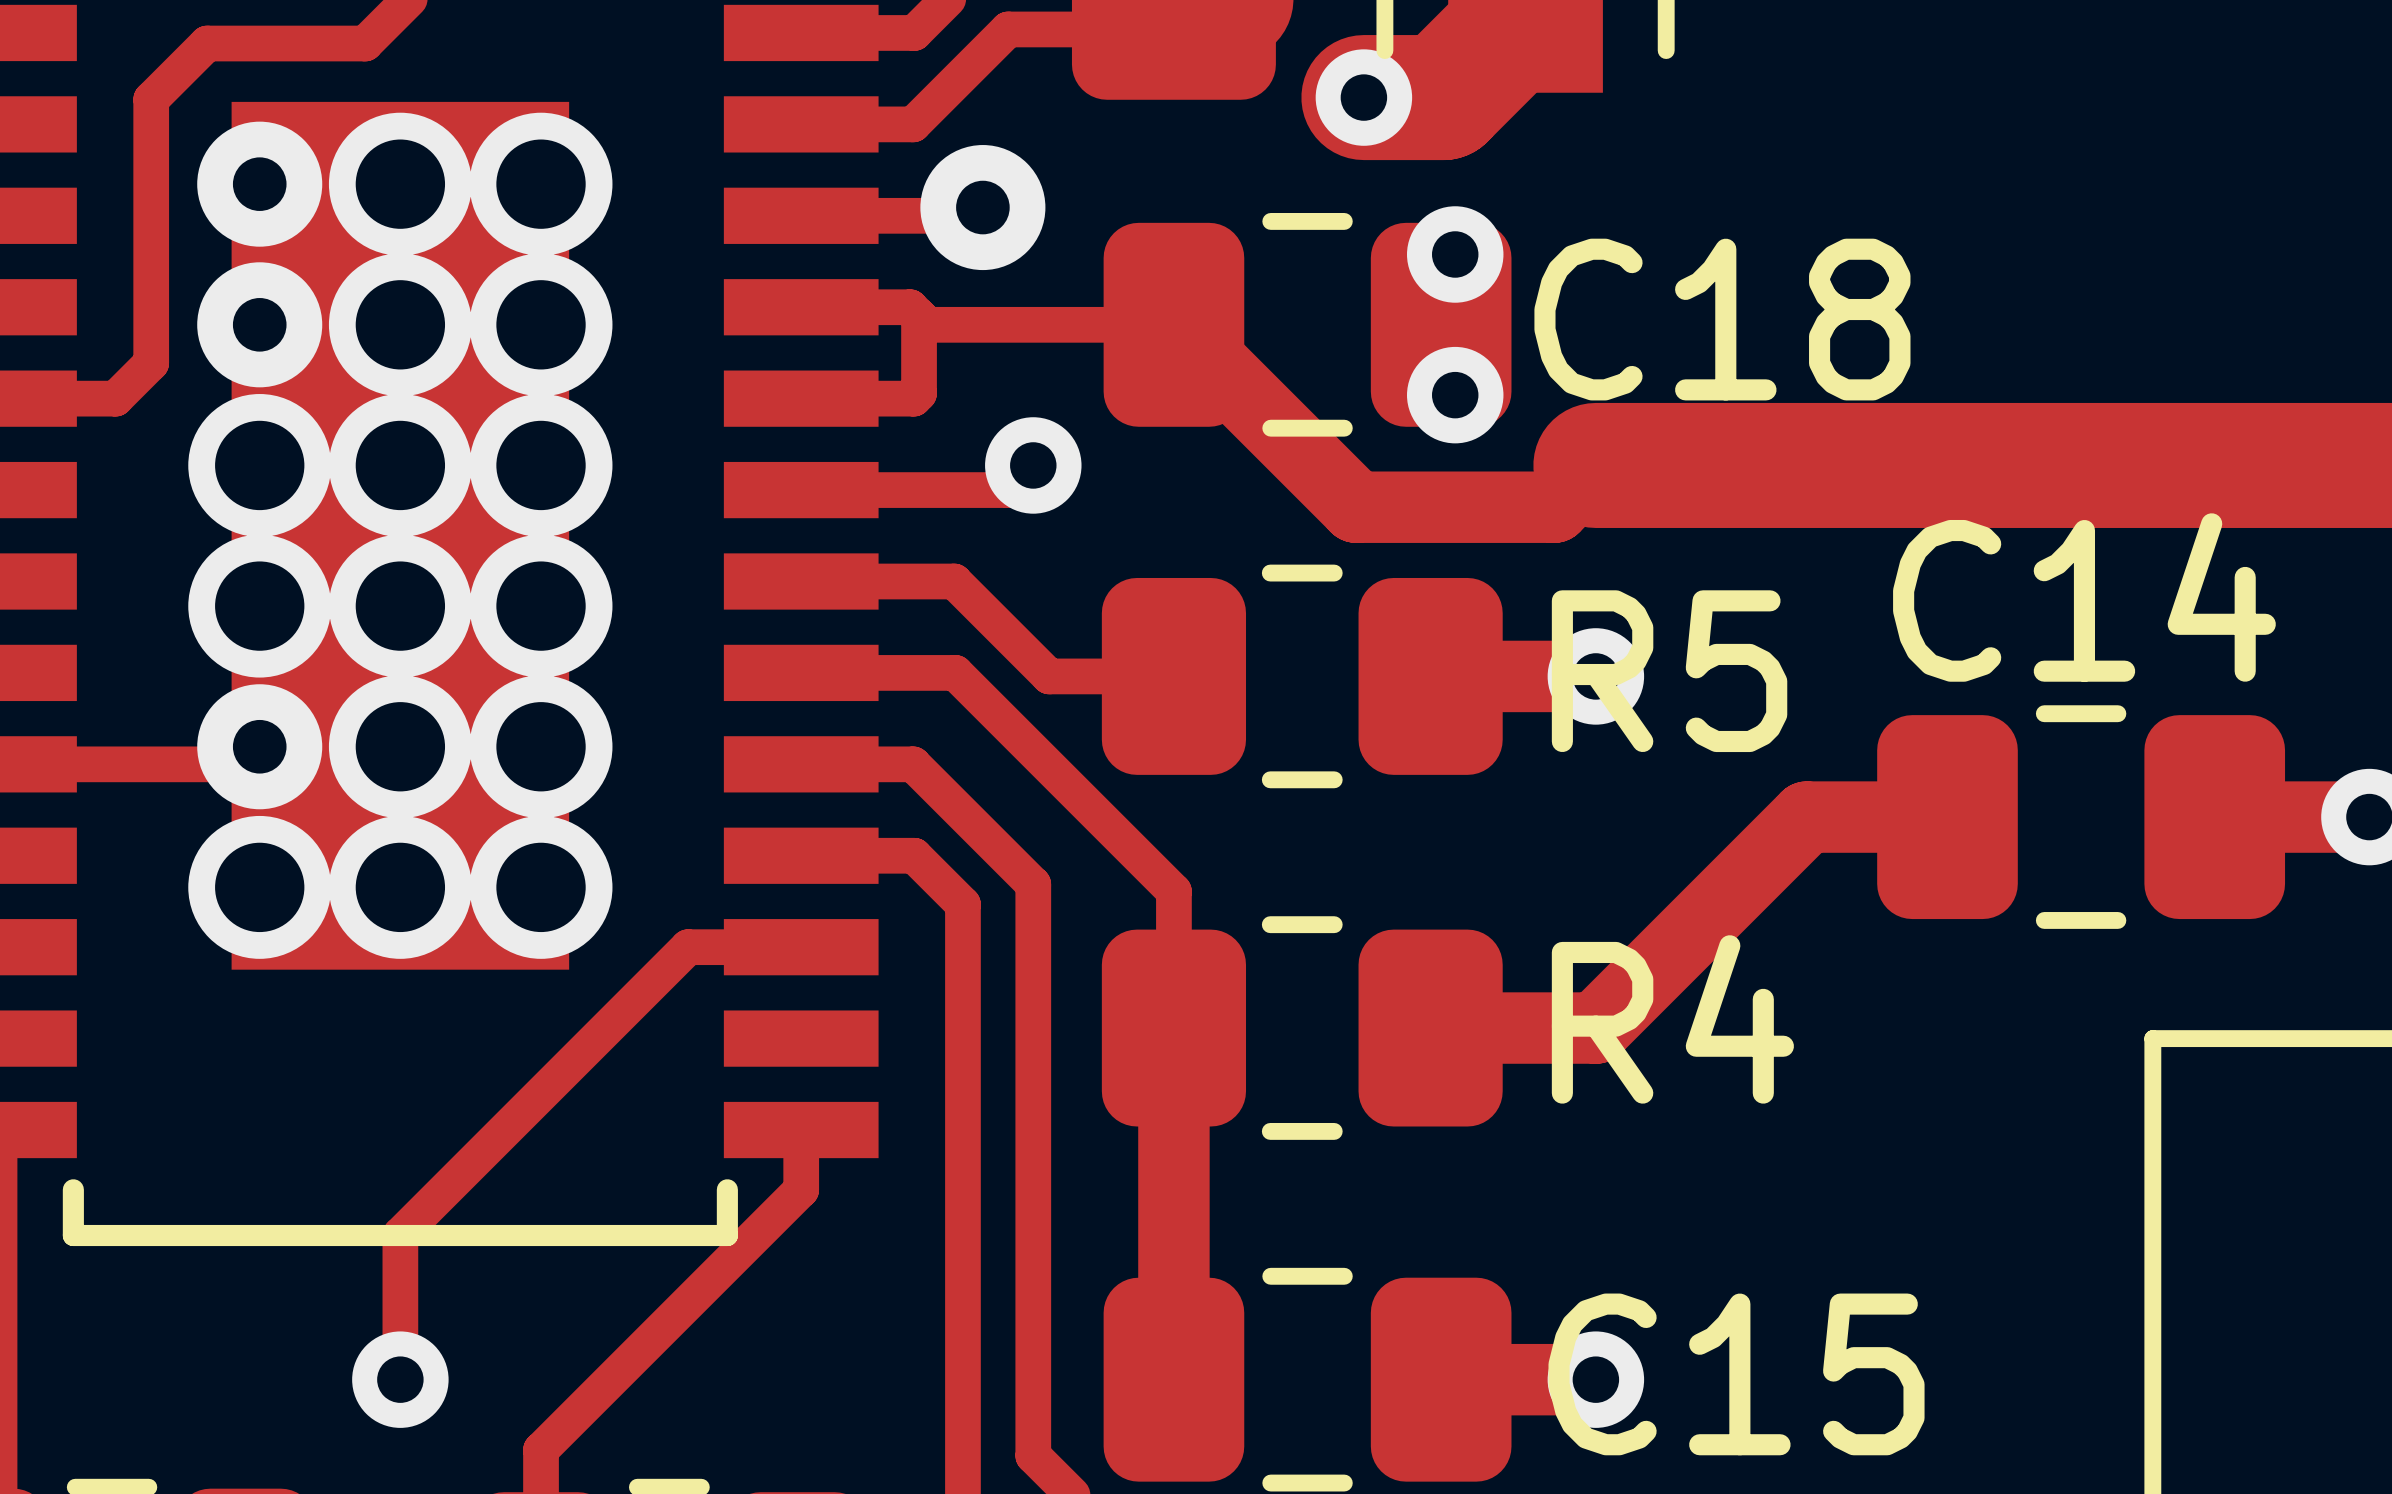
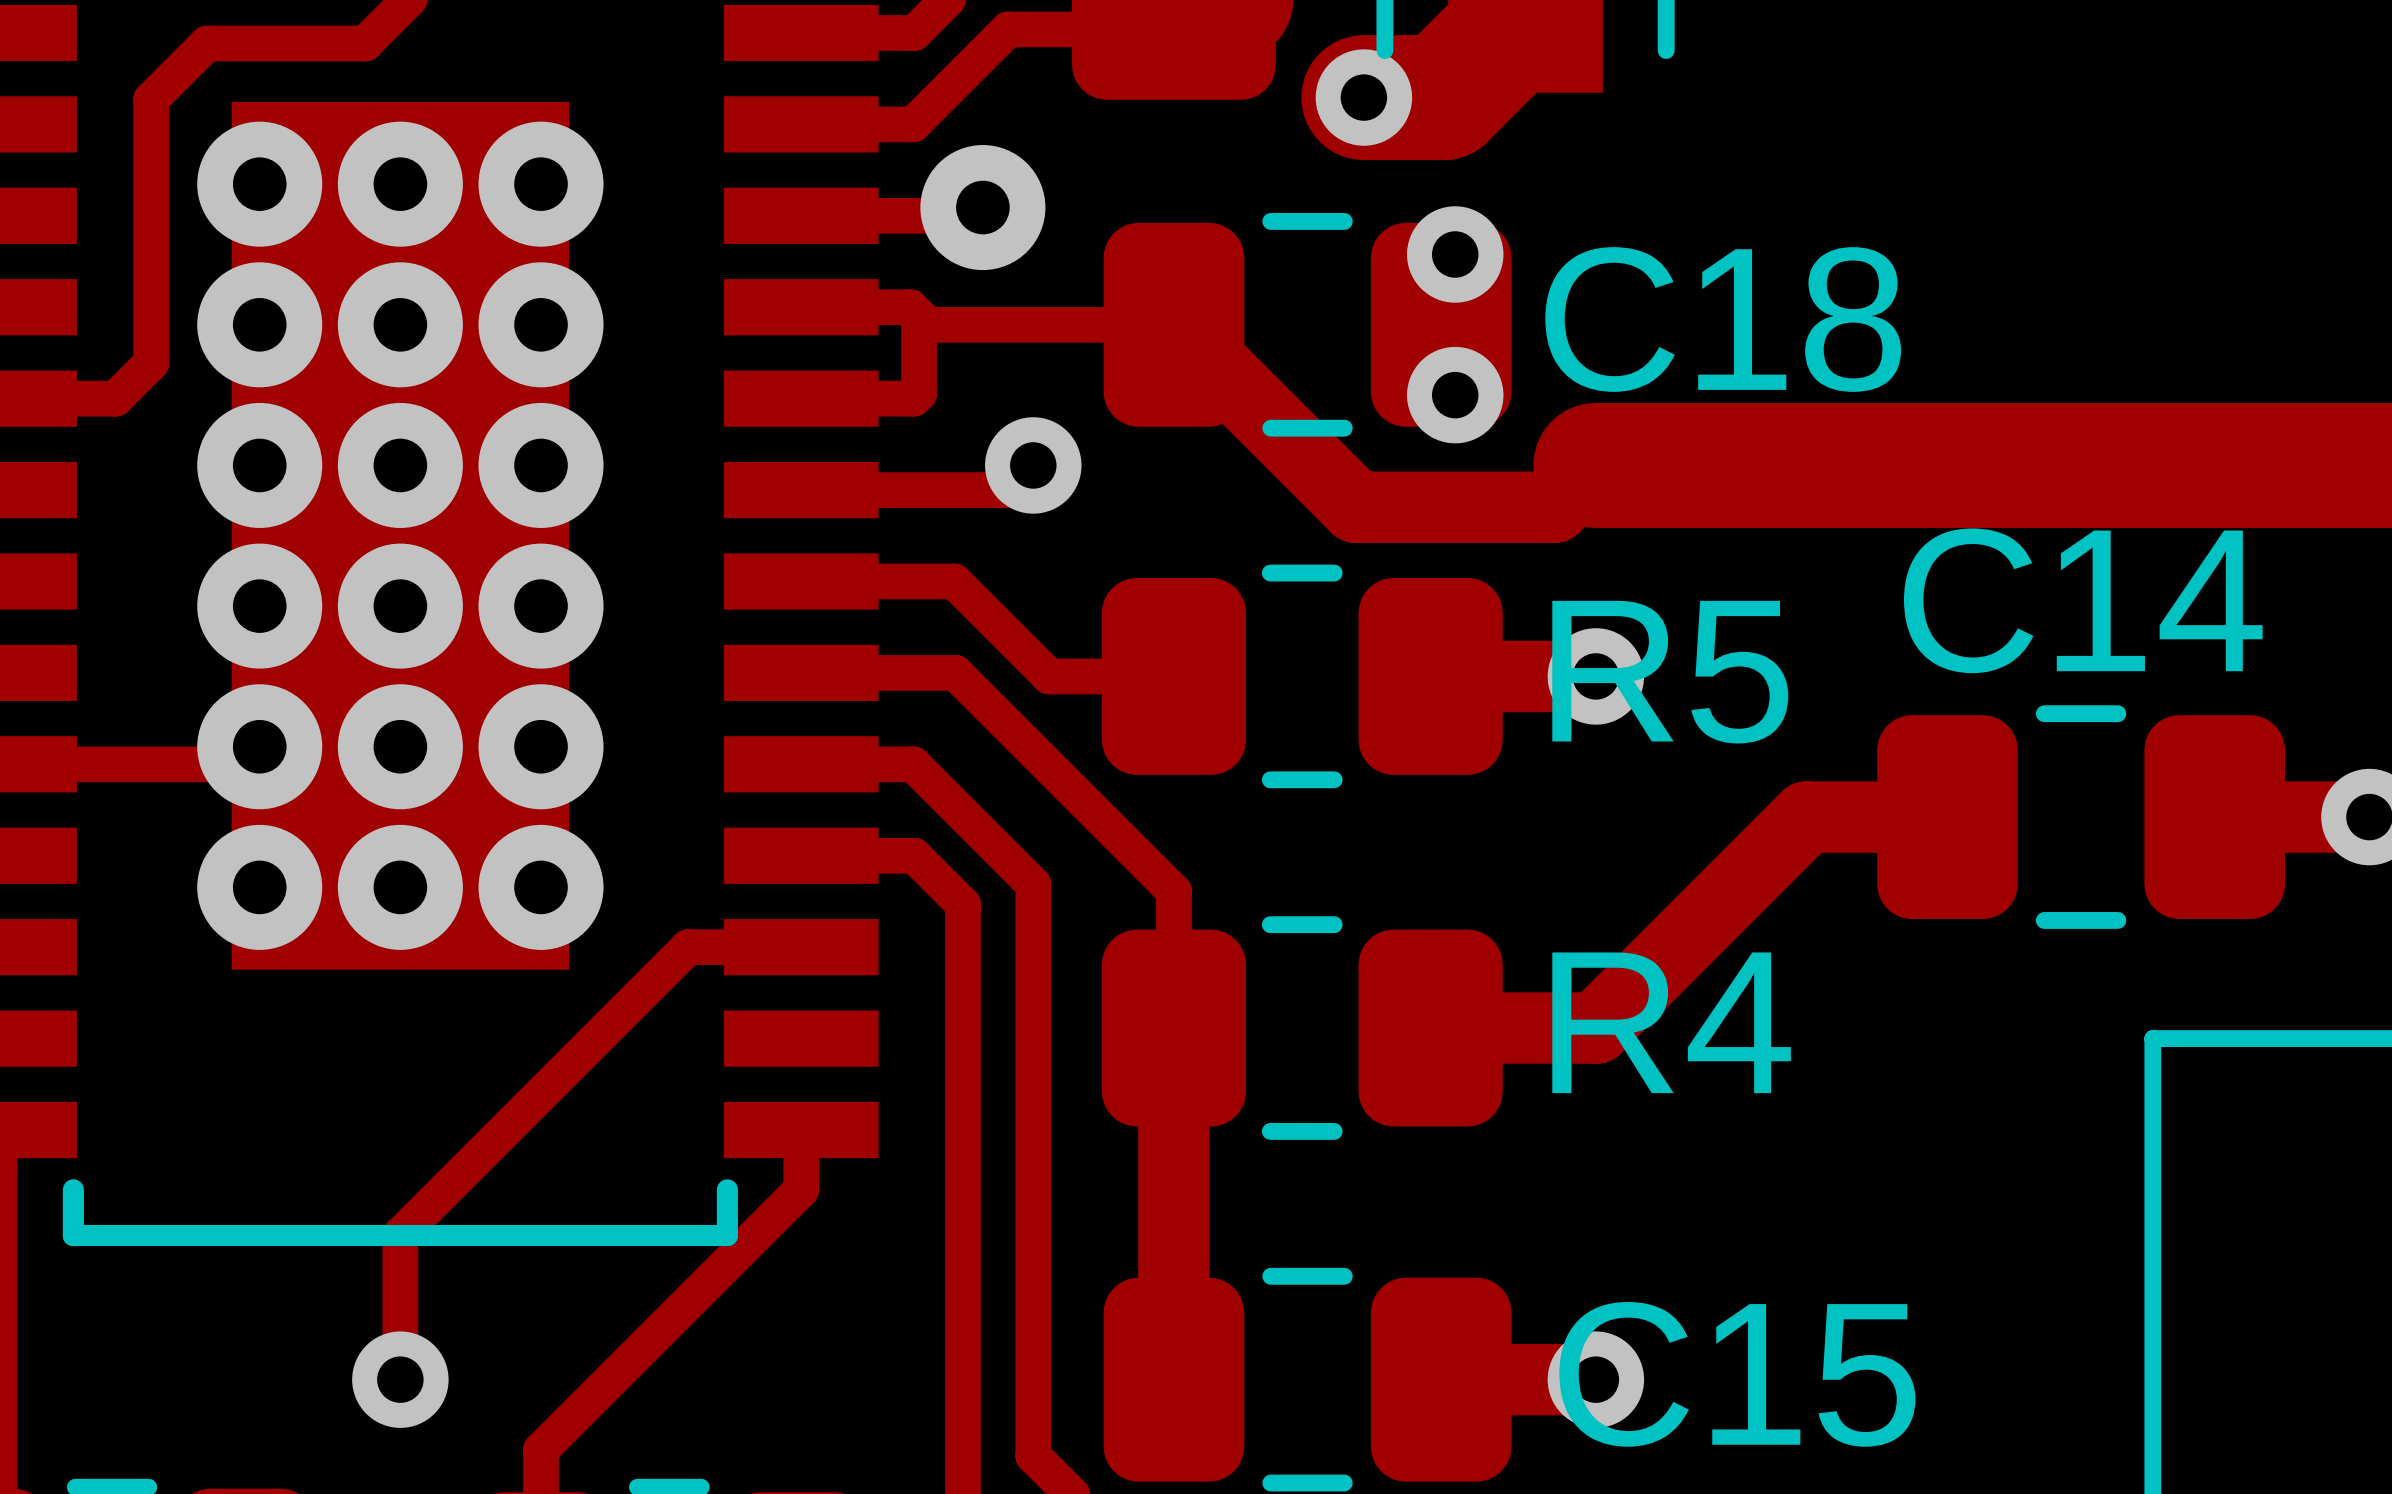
via size: [328, 112, 472, 256] -> [337, 121, 463, 247]
via size: [469, 112, 613, 256] -> [478, 121, 604, 247]
via size: [328, 253, 472, 397] -> [337, 262, 463, 388]
via size: [469, 253, 613, 397] -> [478, 262, 604, 388]
via size: [188, 394, 332, 537] -> [197, 402, 323, 528]
via size: [328, 394, 472, 537] -> [337, 402, 463, 528]
via size: [469, 394, 613, 537] -> [478, 402, 604, 528]
via size: [188, 534, 332, 678] -> [197, 543, 323, 669]
via size: [328, 534, 472, 678] -> [337, 543, 463, 669]
via size: [469, 534, 613, 678] -> [478, 543, 604, 669]
via size: [328, 675, 472, 819] -> [337, 684, 463, 810]
via size: [469, 675, 613, 819] -> [478, 684, 604, 810]
via size: [188, 815, 332, 959] -> [197, 824, 323, 950]
via size: [328, 815, 472, 959] -> [337, 824, 463, 950]
via size: [469, 815, 613, 959] -> [478, 824, 604, 950]

